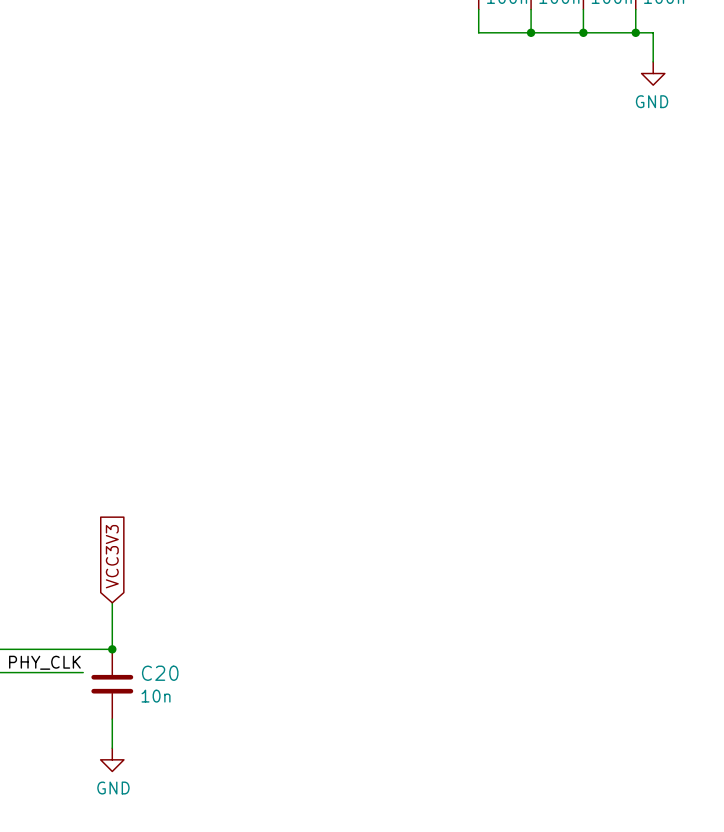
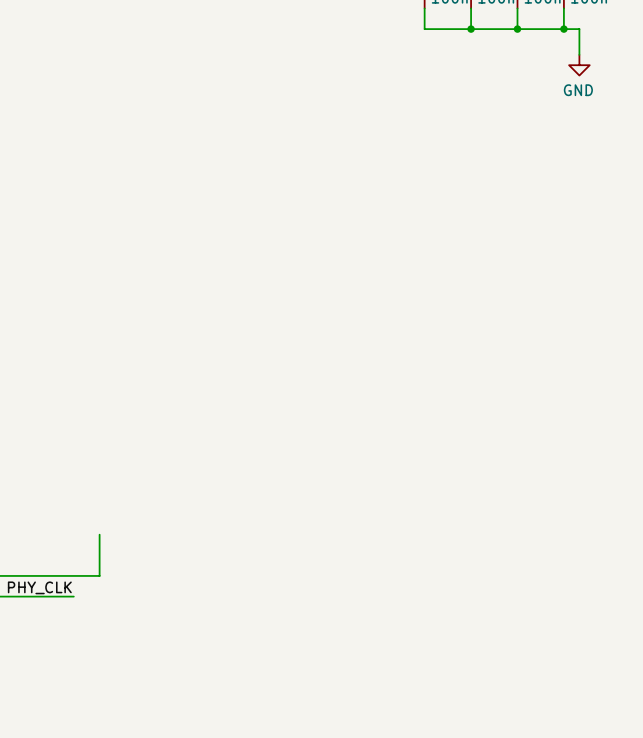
global label: VCC3V3 (112, 556) -> none
junction: (112, 649) -> none
C20: (112, 684) -> none
wire: (112, 719) (112, 748) -> none
power symbol: GND (112, 759) -> none

